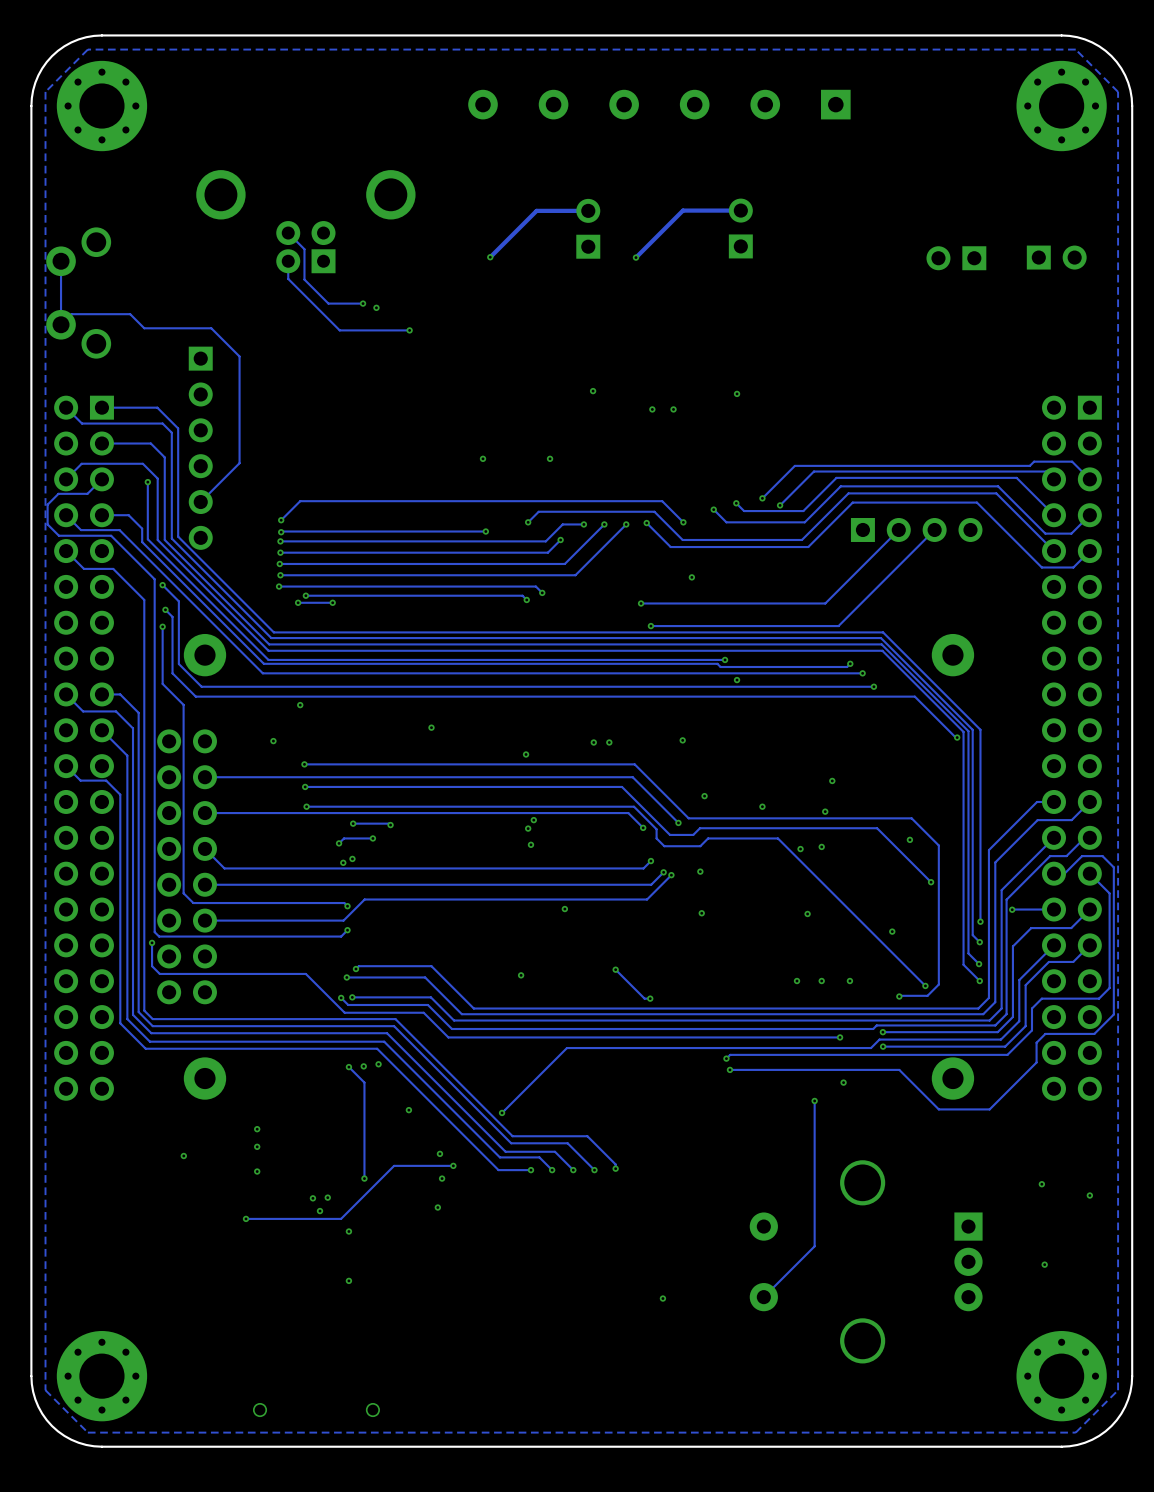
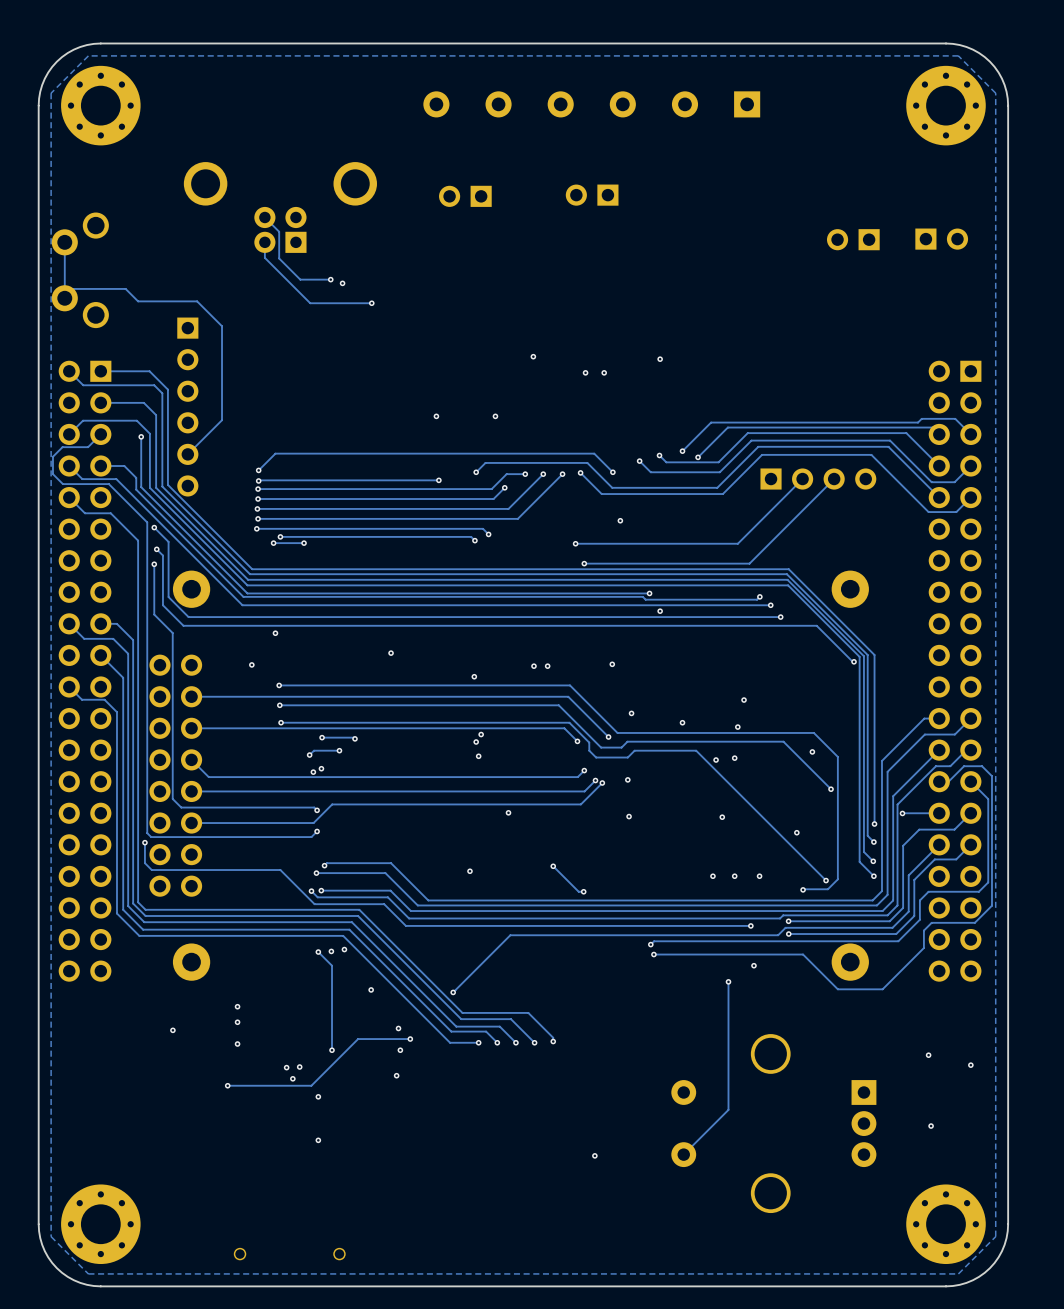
part: none -> (592, 195)
part: none -> (465, 196)
track: (588, 210) (536, 210) (490, 257) -> none
track: (740, 210) (682, 210) (635, 257) -> none
part: (588, 228) -> none
part: (740, 228) -> none
via: (490, 257) -> none
via: (635, 257) -> none

